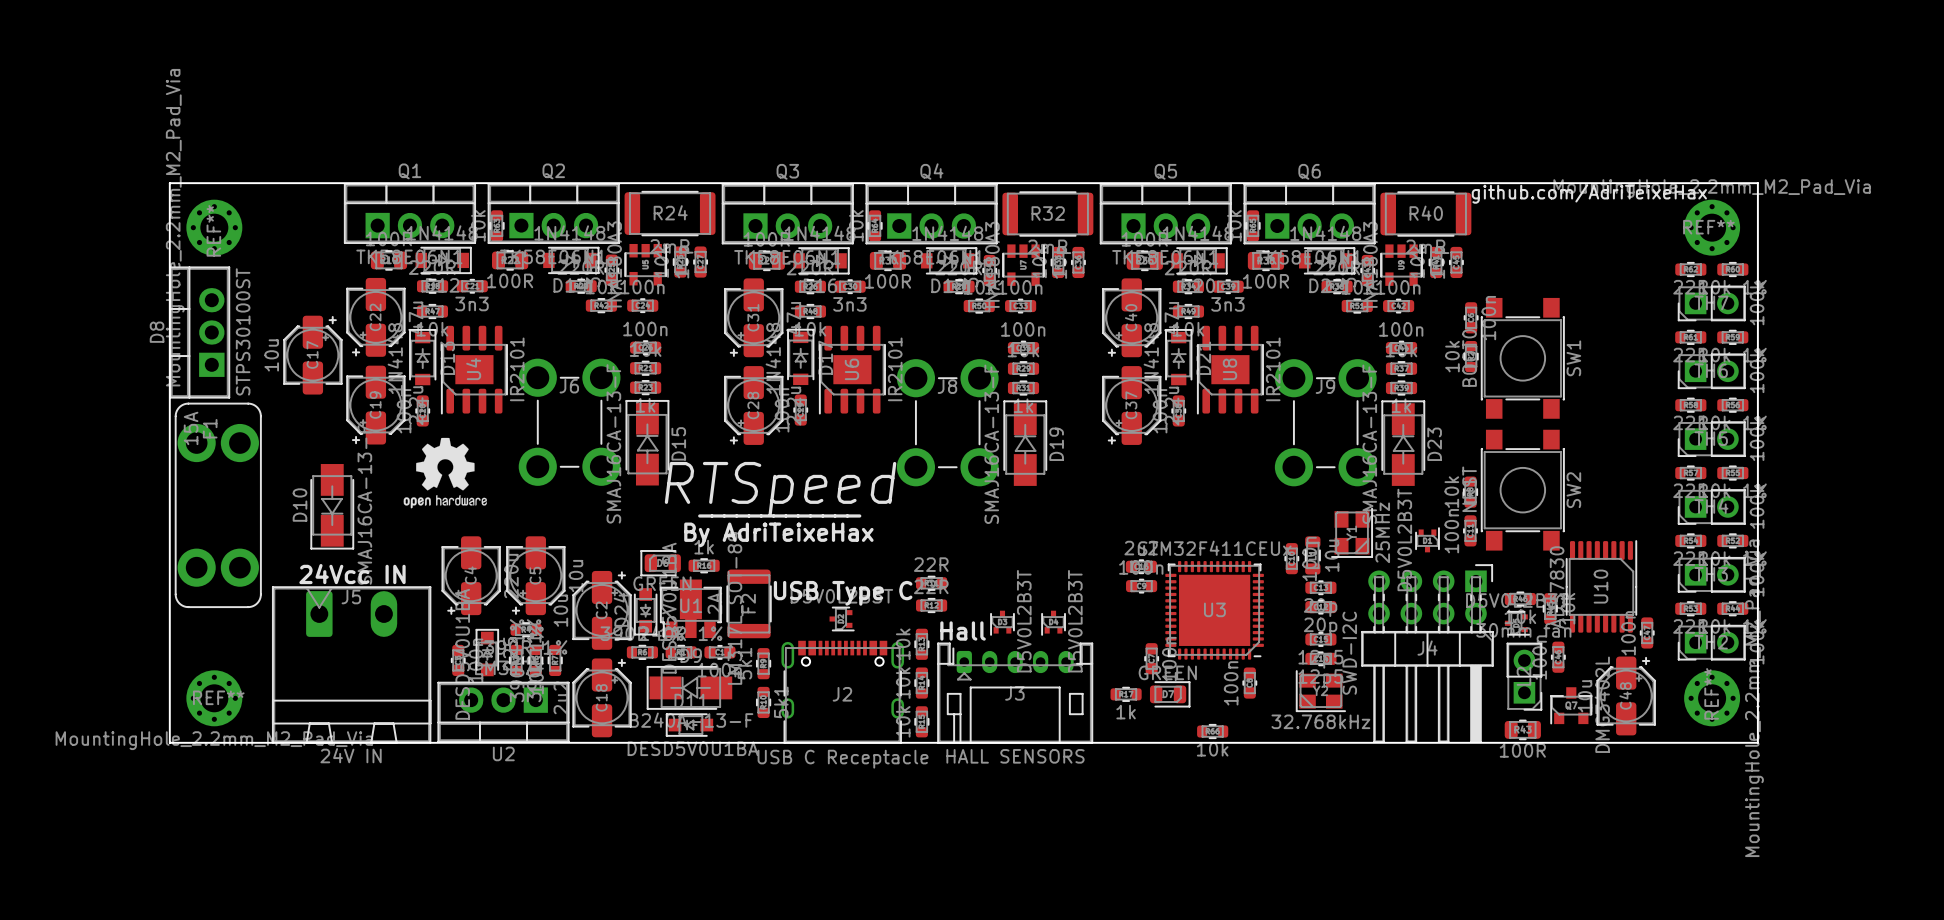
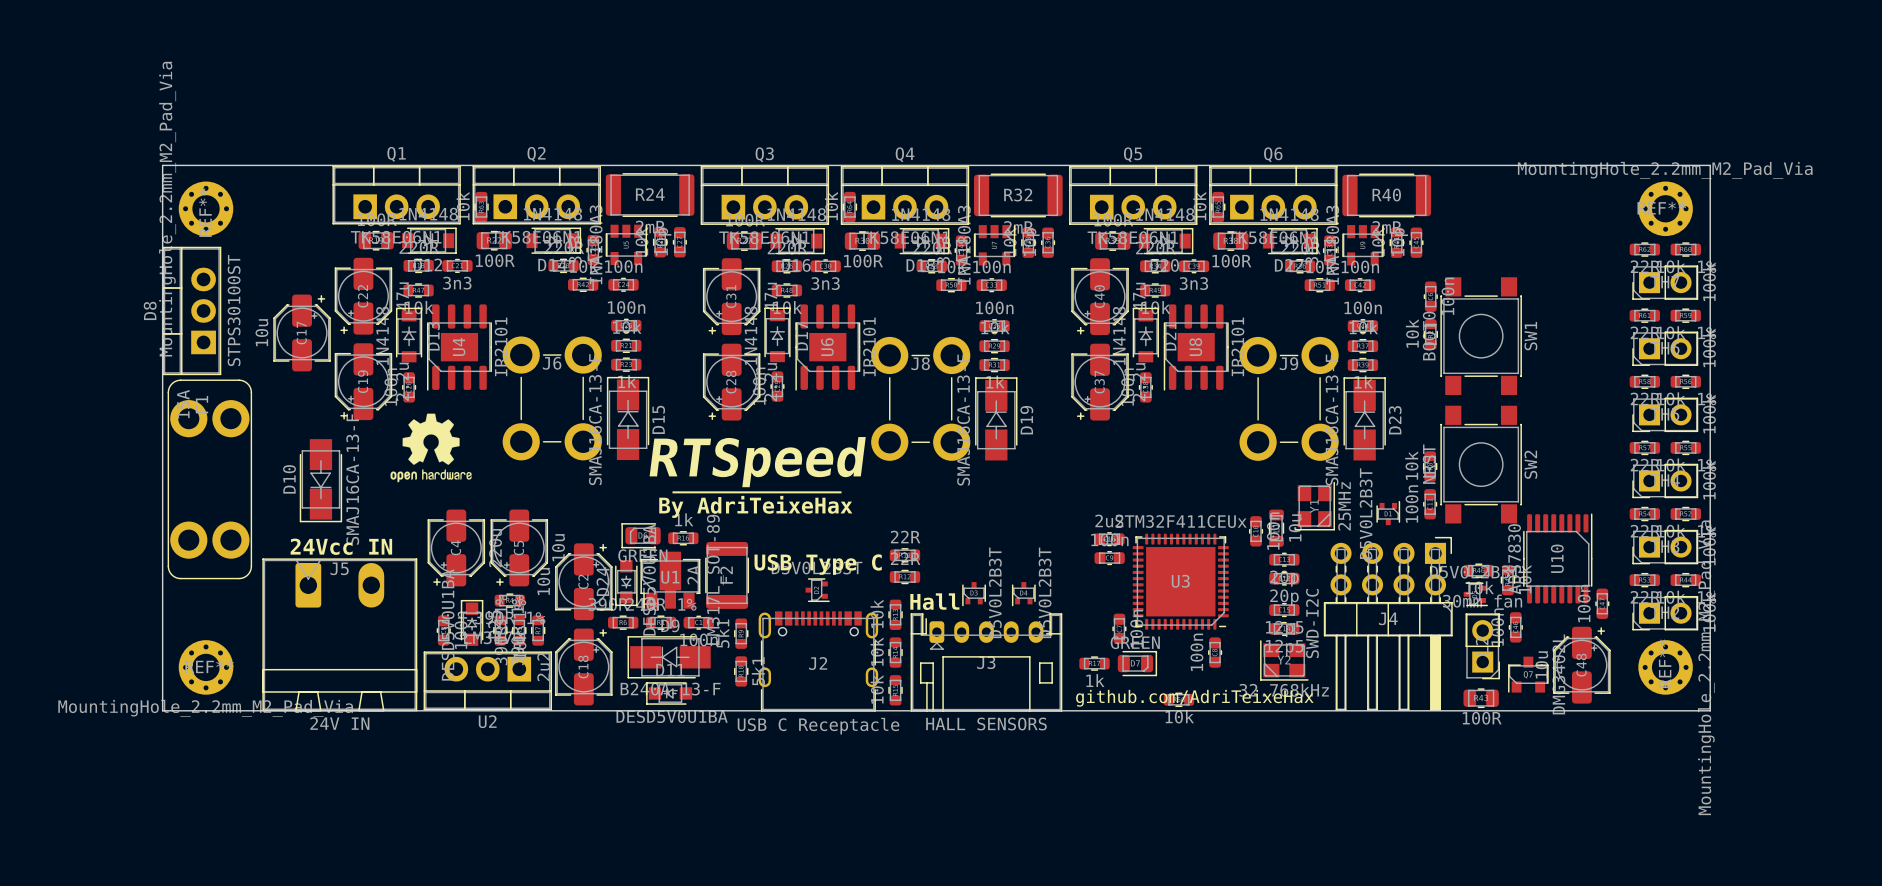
text: github.com/AdriTeixeHax (1589, 193) -> none
text: none -> github.com/AdriTeixeHax (1194, 698)

